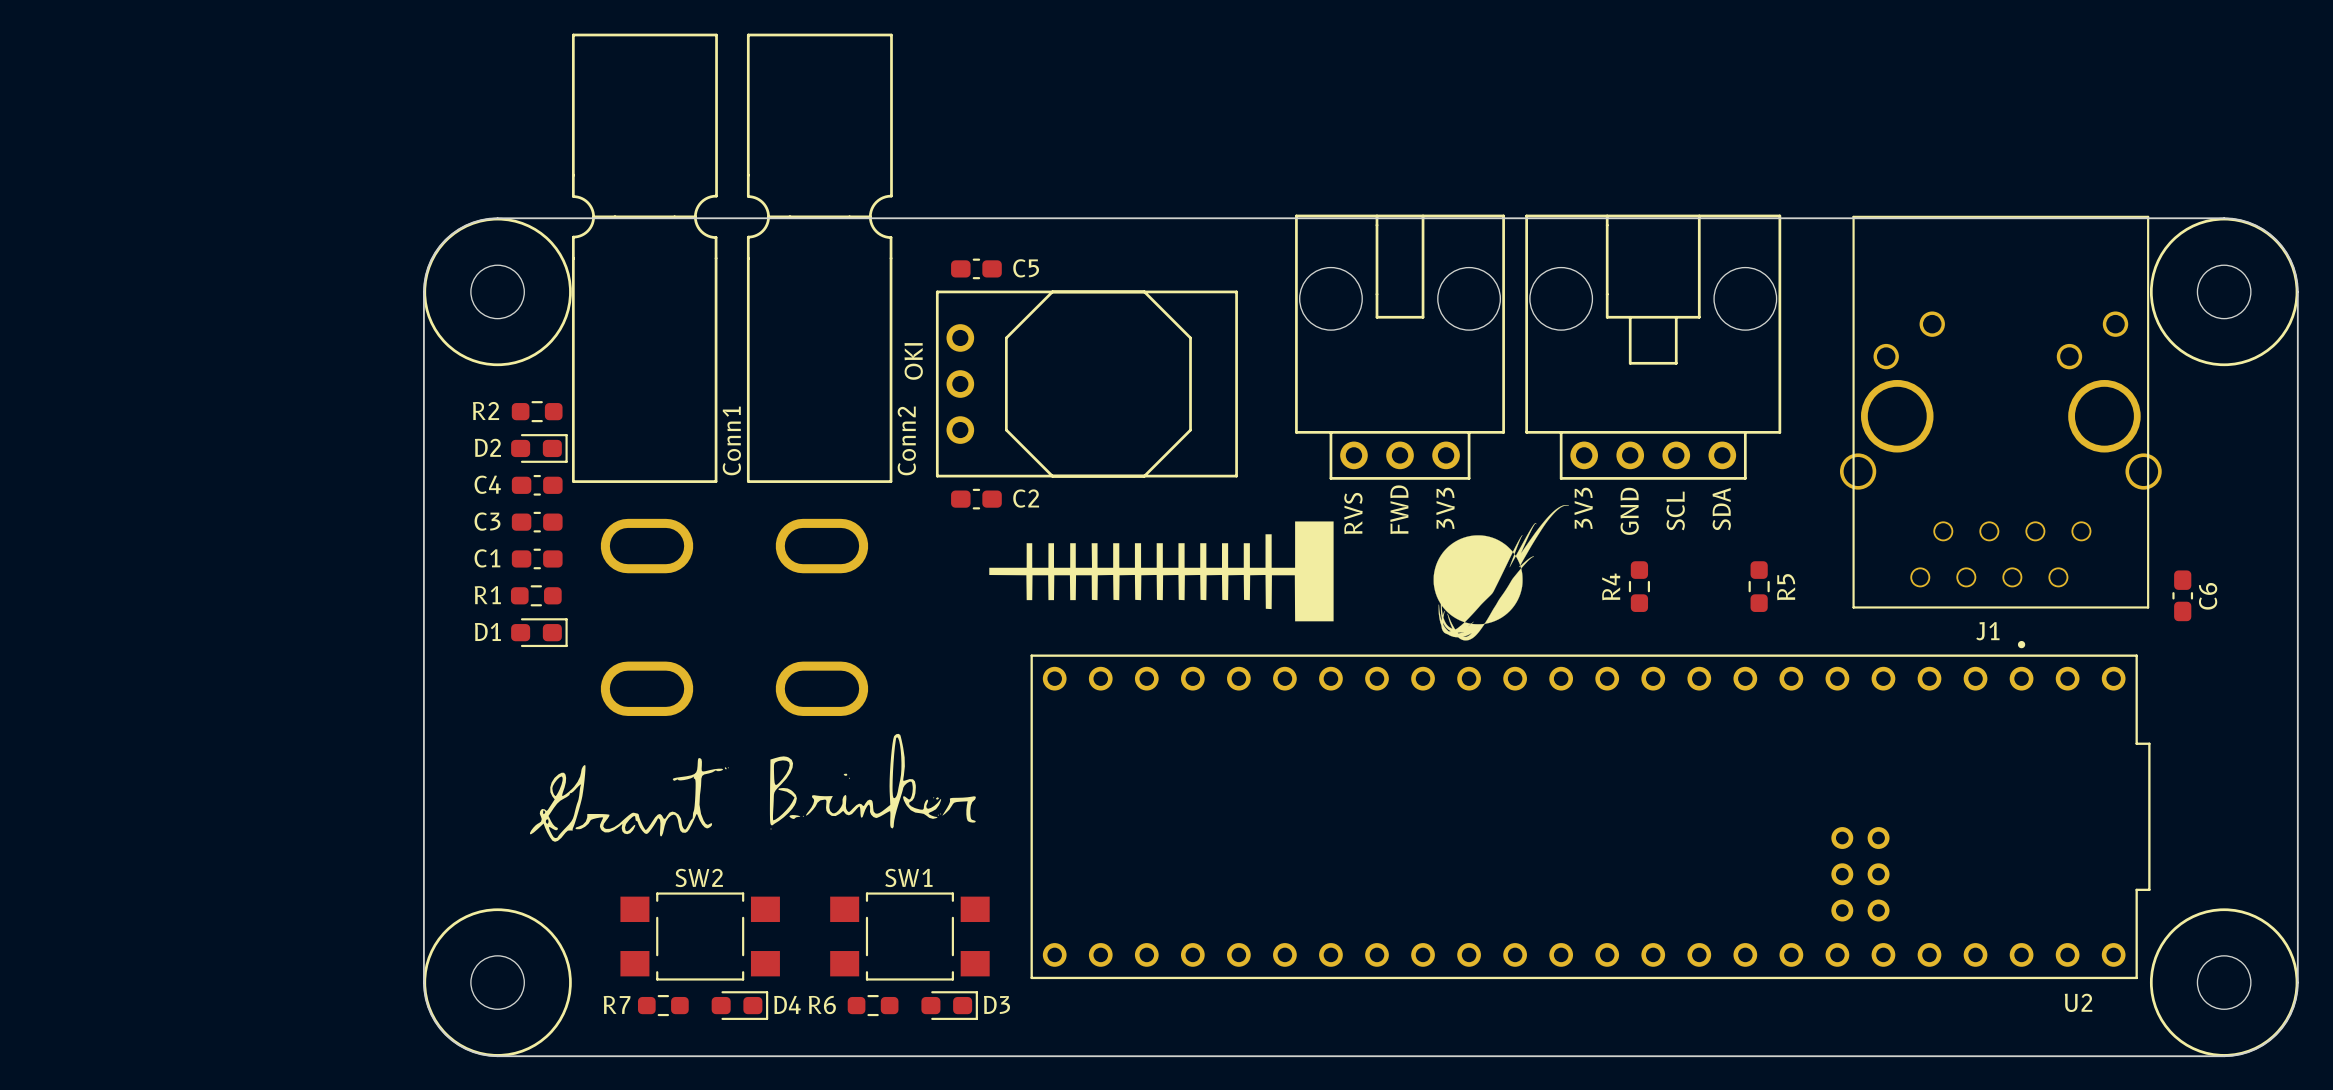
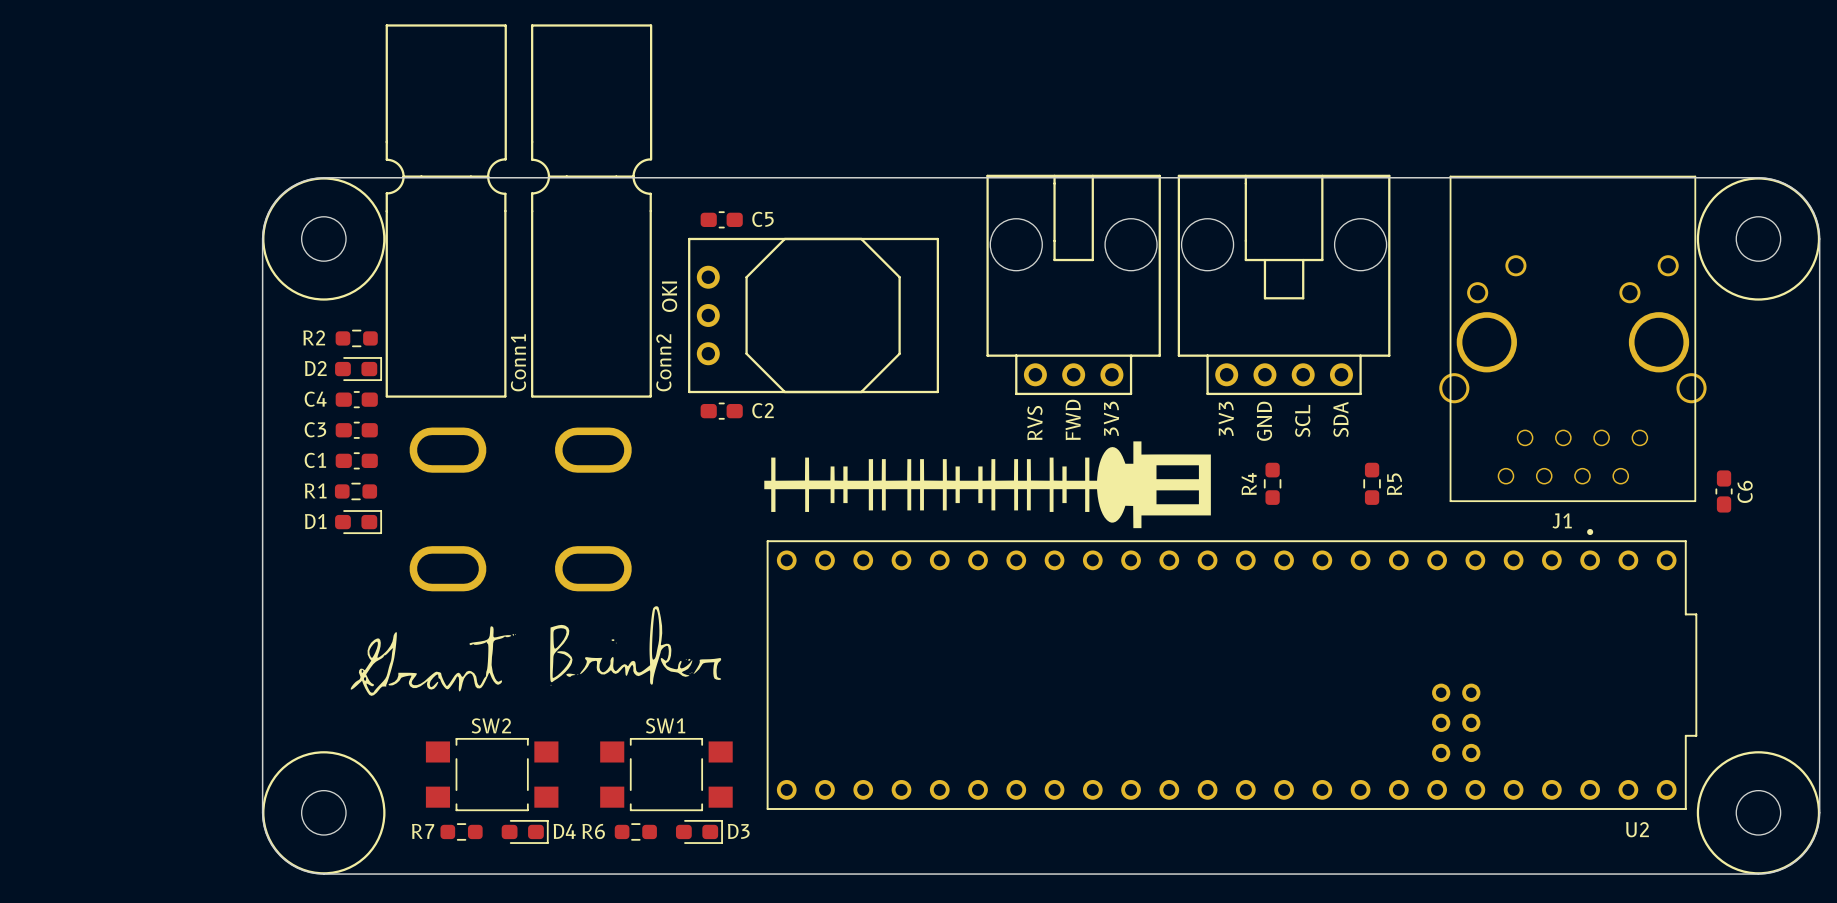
drawing: [1433, 505, 1570, 641] -> none
drawing: [989, 521, 1334, 622] -> none
drawing: none -> [764, 441, 1211, 529]

